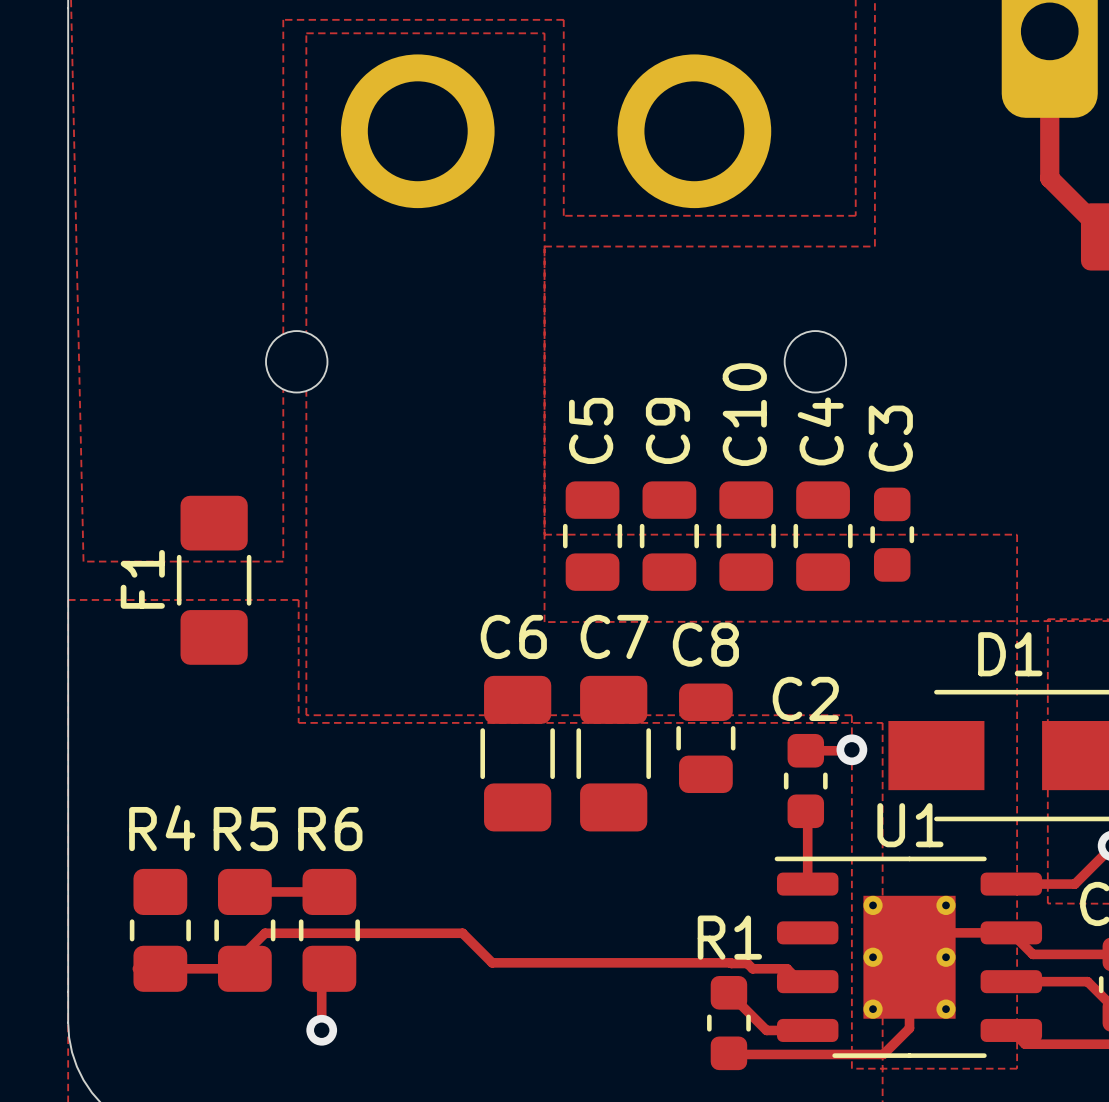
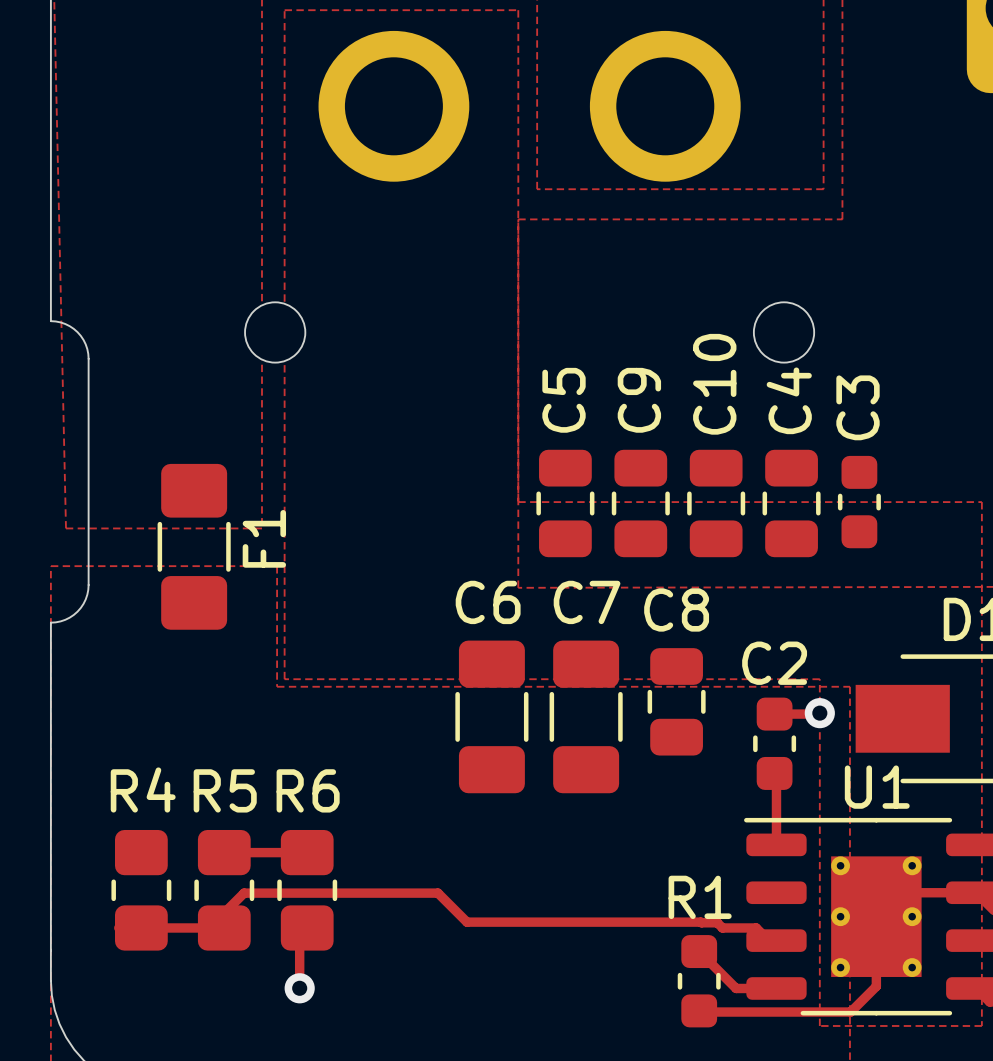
board edge: (68, 350) (68, 657) -> (50, 321) (65, 324) (77, 332) (85, 344) (88, 358) (88, 589) (85, 599) (77, 611) (65, 619) (50, 622)
F1 name position: F1 (142, 579) -> F1 (264, 538)

